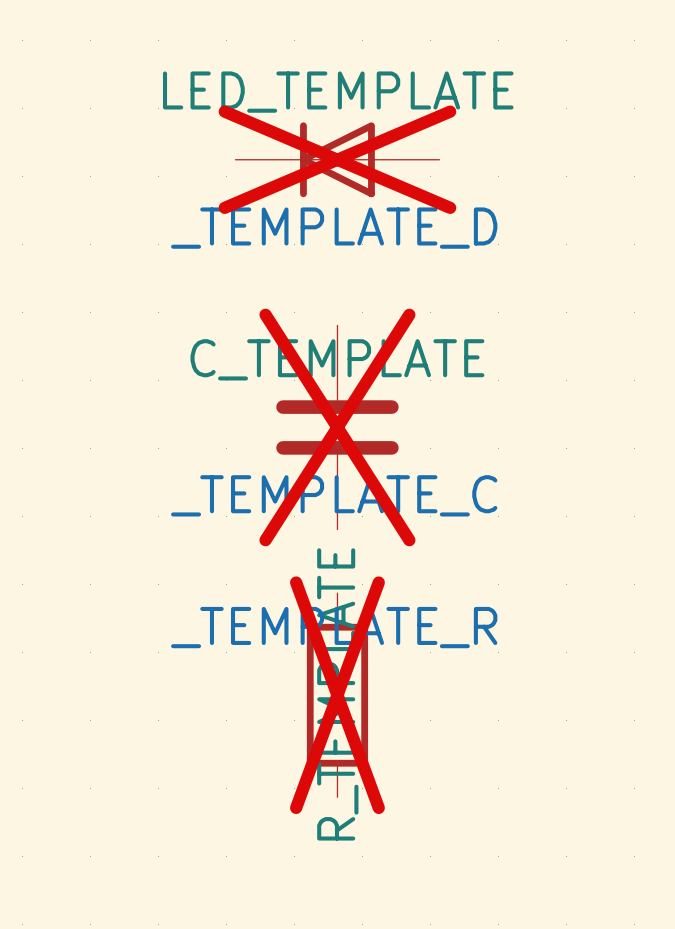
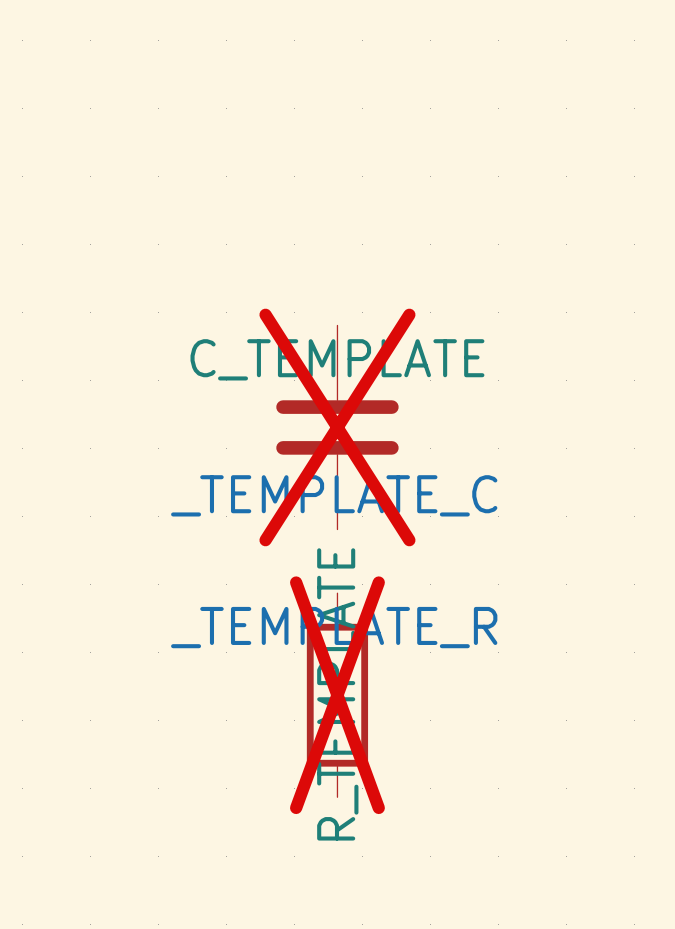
_TEMPLATE_D: LED_TEMPLATE (337, 159) -> none

